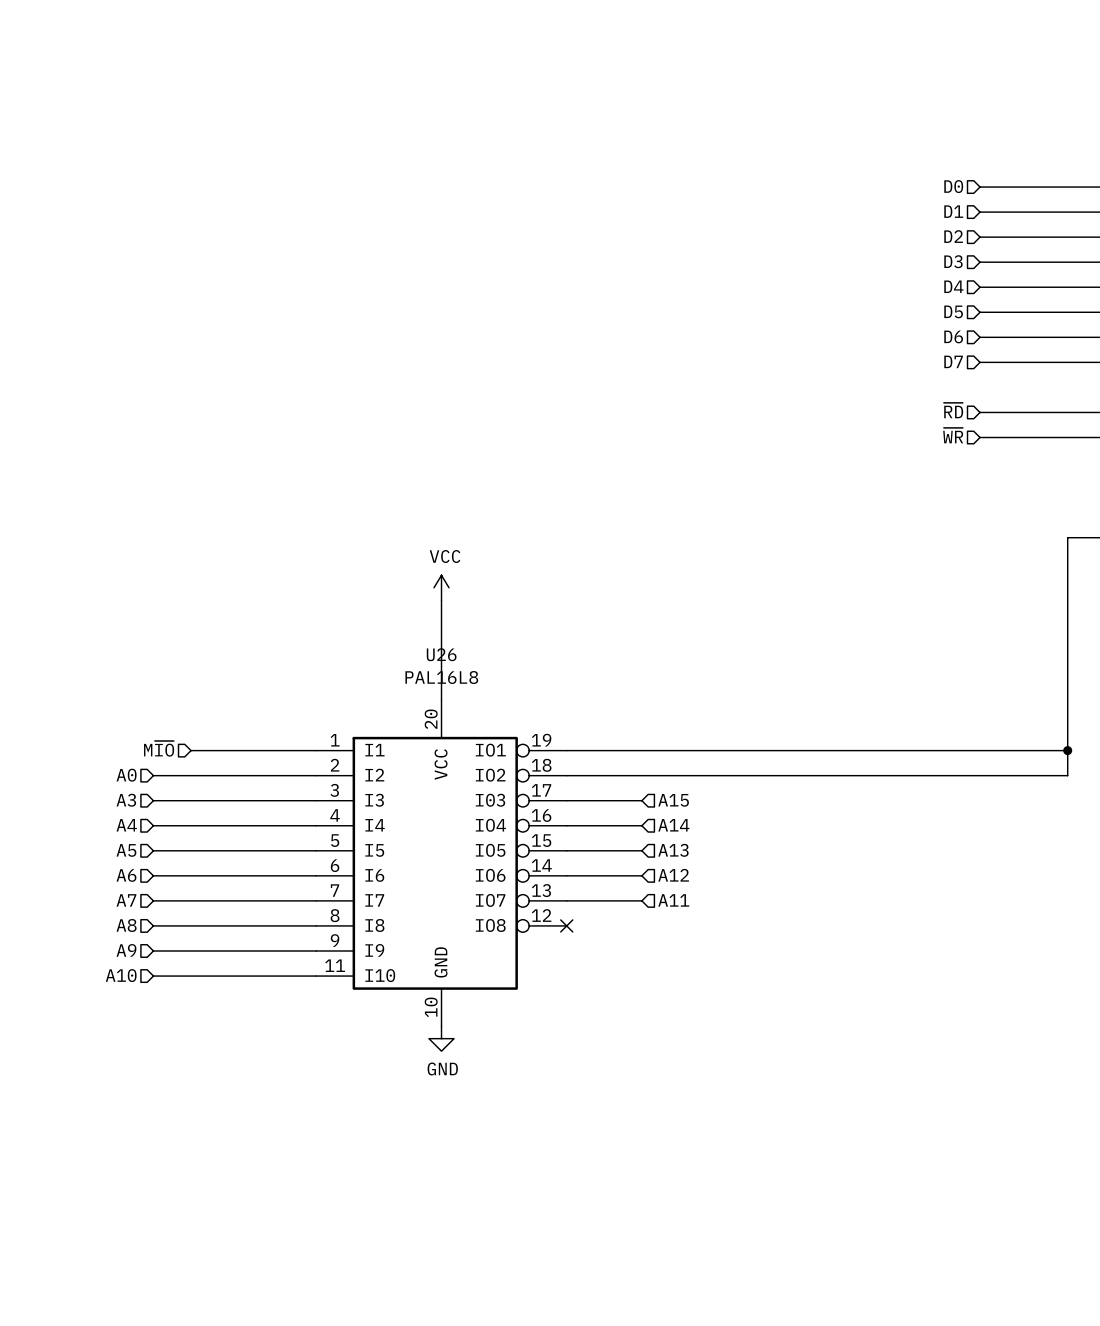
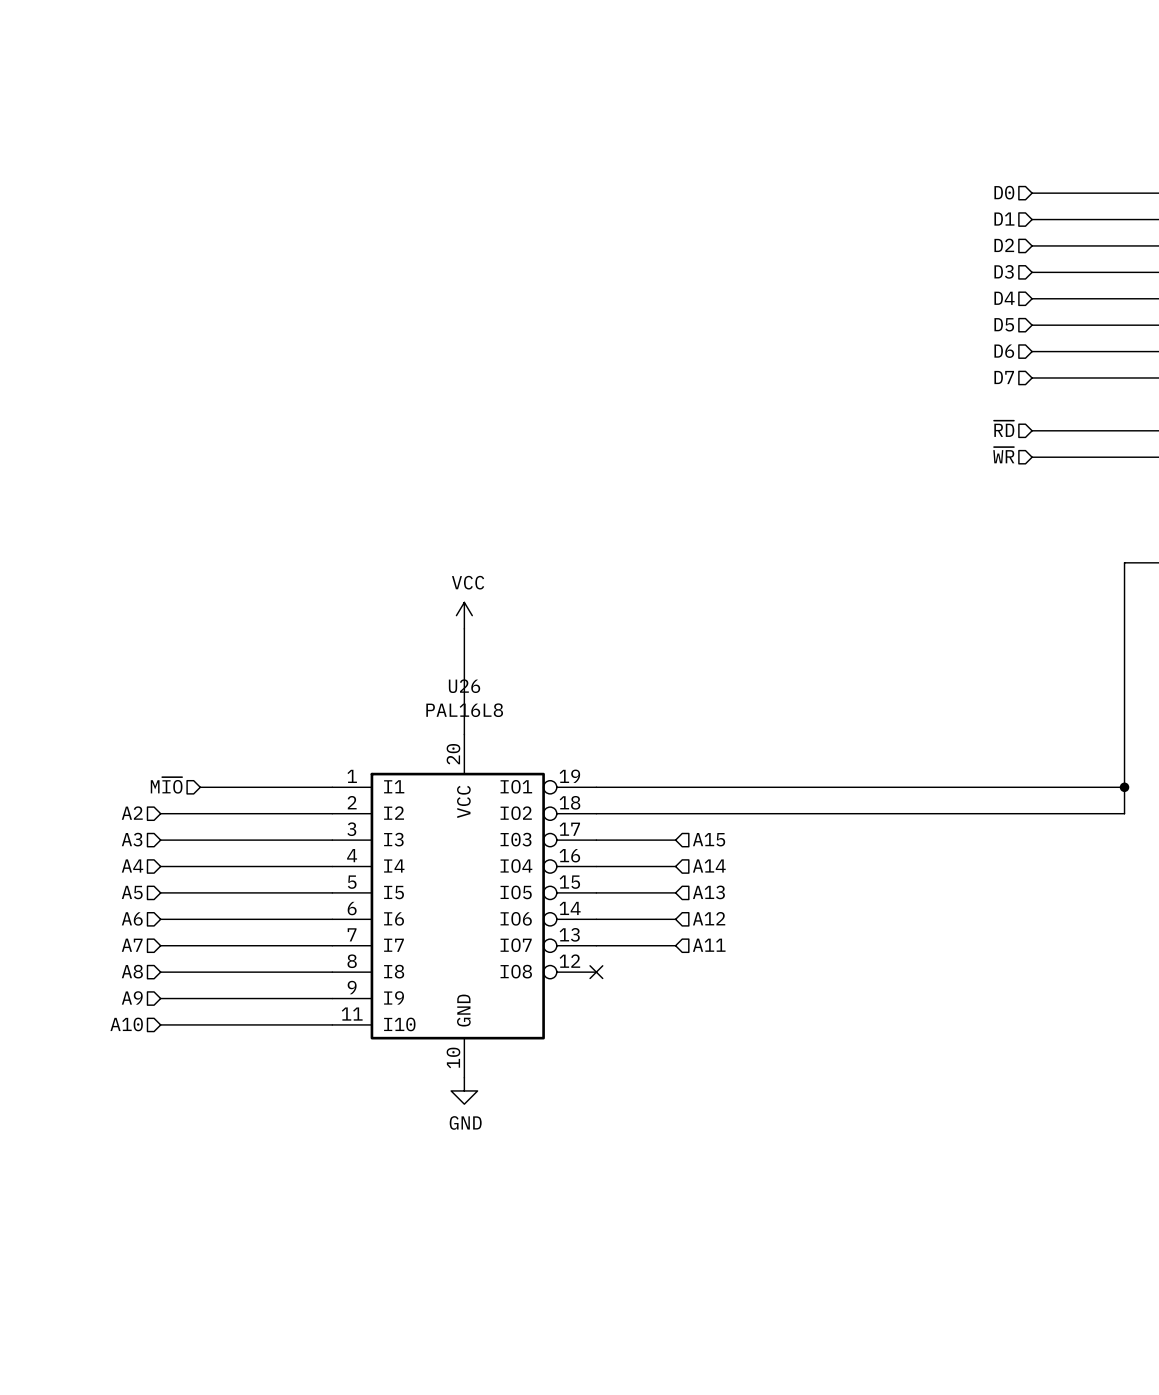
hierarchical label: A0 (126, 775) -> A2 (132, 813)

